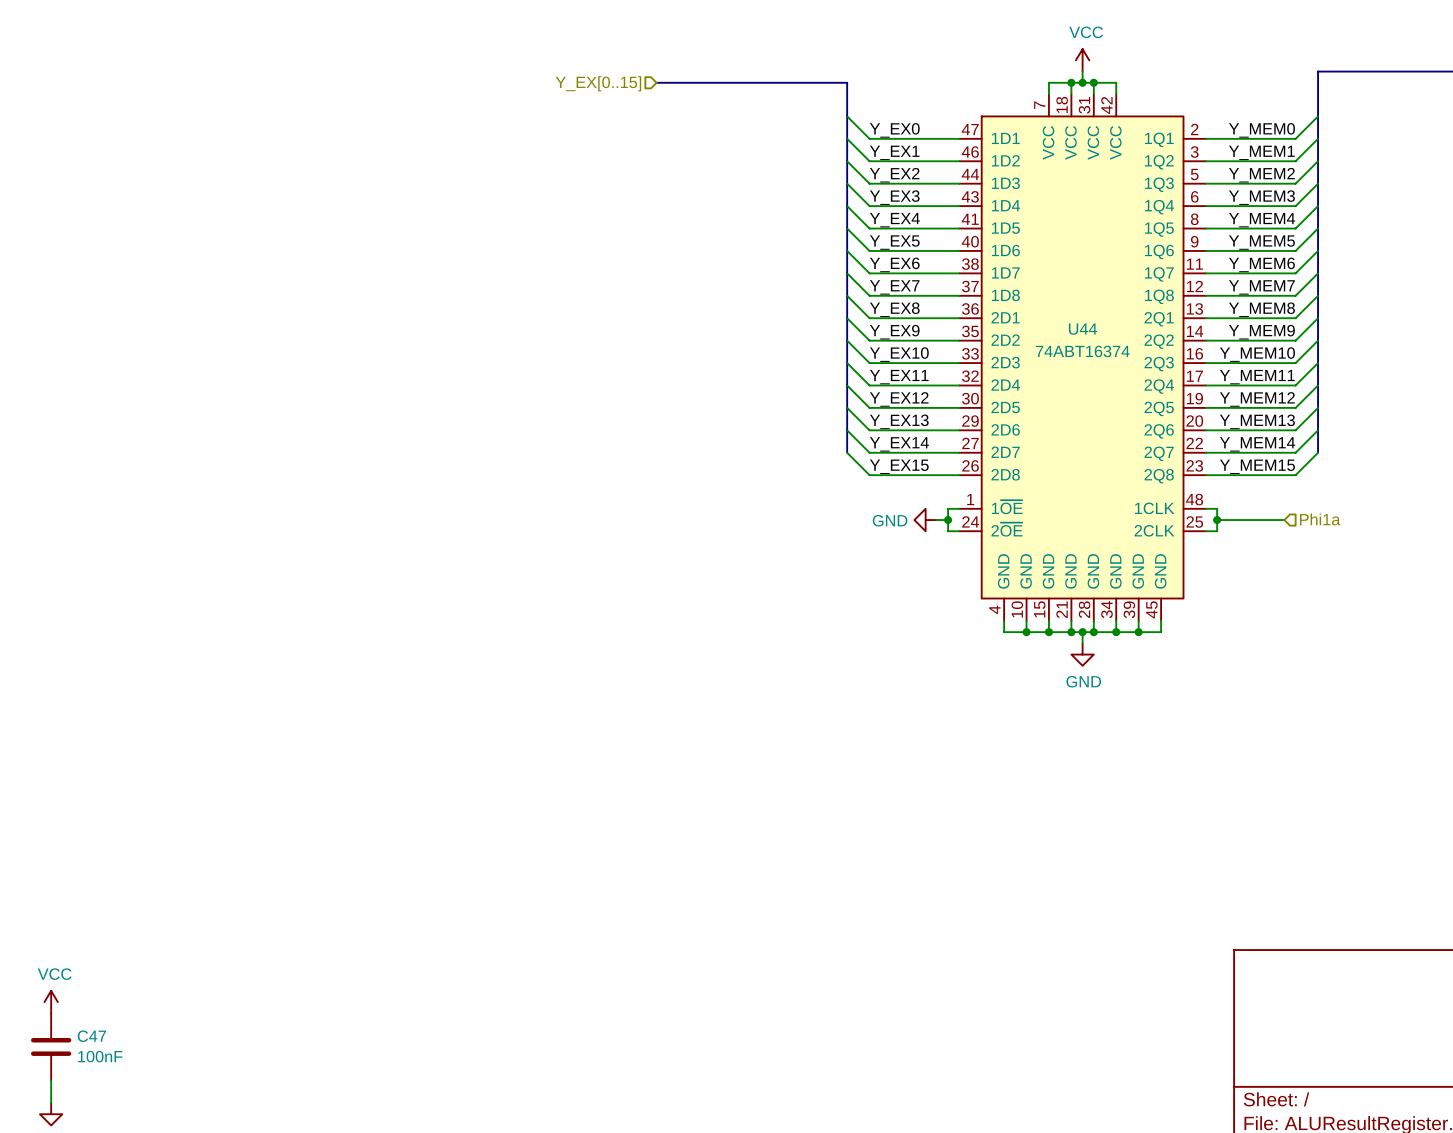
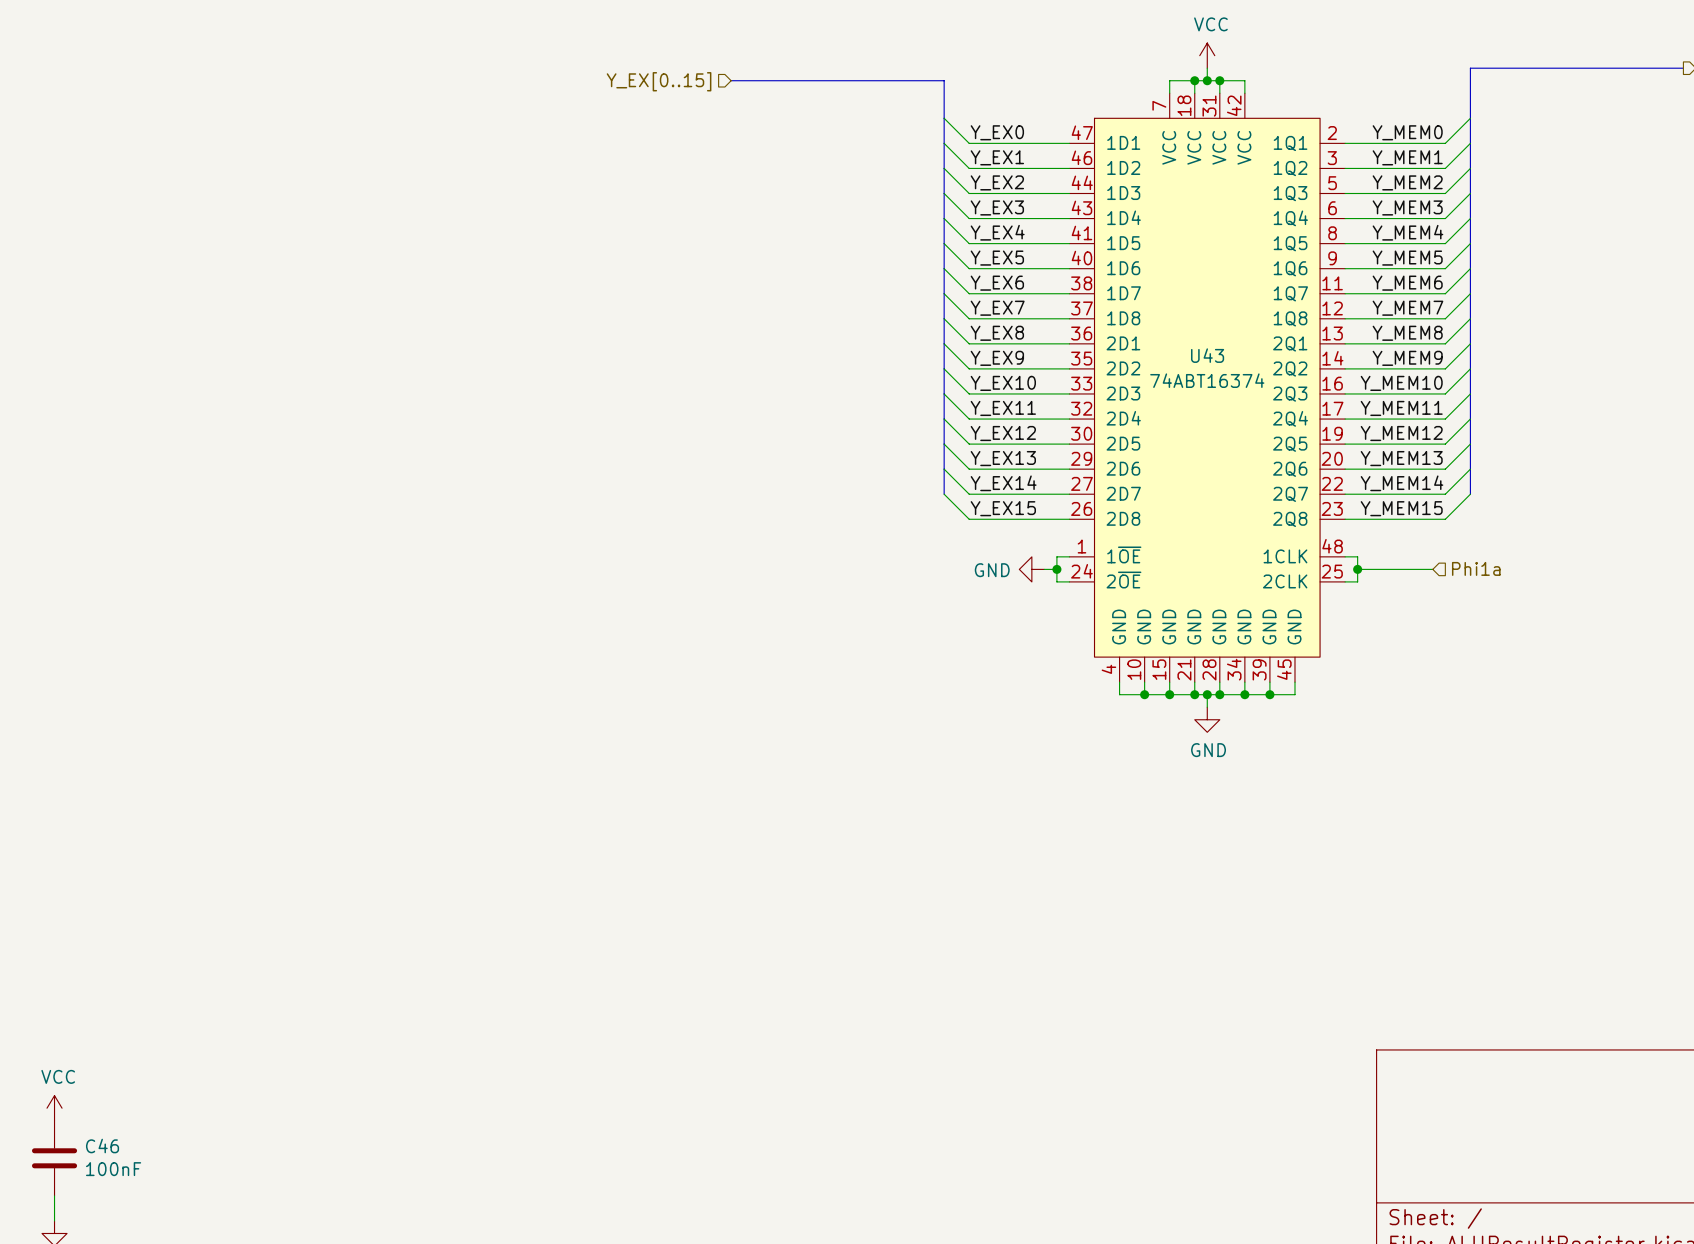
U44 name: U44 (1082, 329) -> U43 (1207, 355)
C47 name: C47 (91, 1036) -> C46 (102, 1146)

